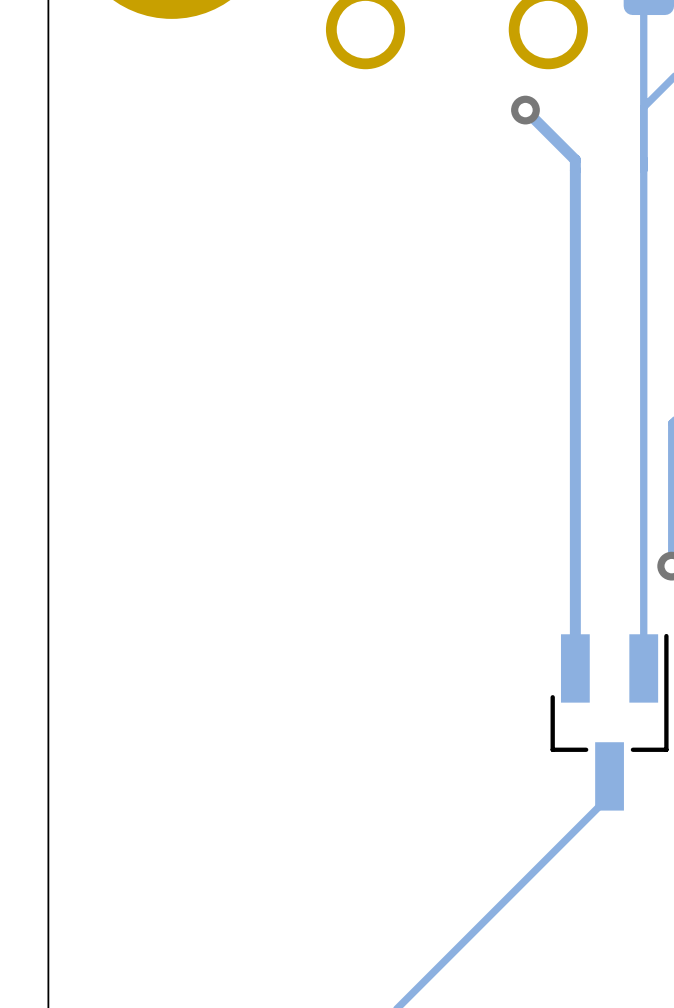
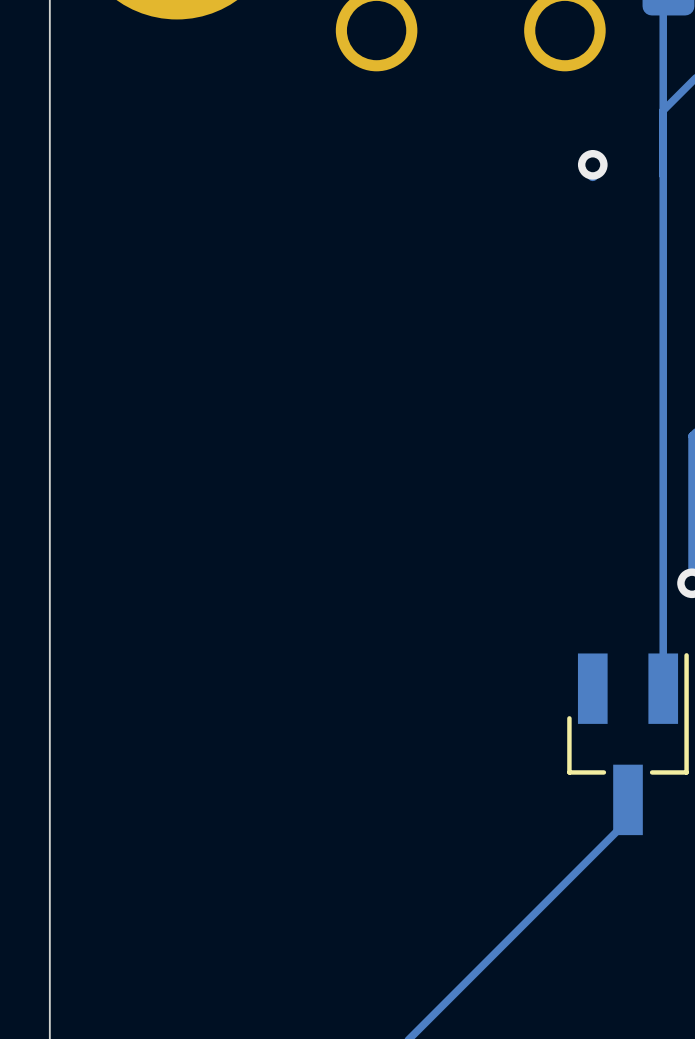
track: (525, 110) (575, 159) -> none
via position: (525, 110) -> (592, 164)
track: (575, 170) (575, 668) -> none

